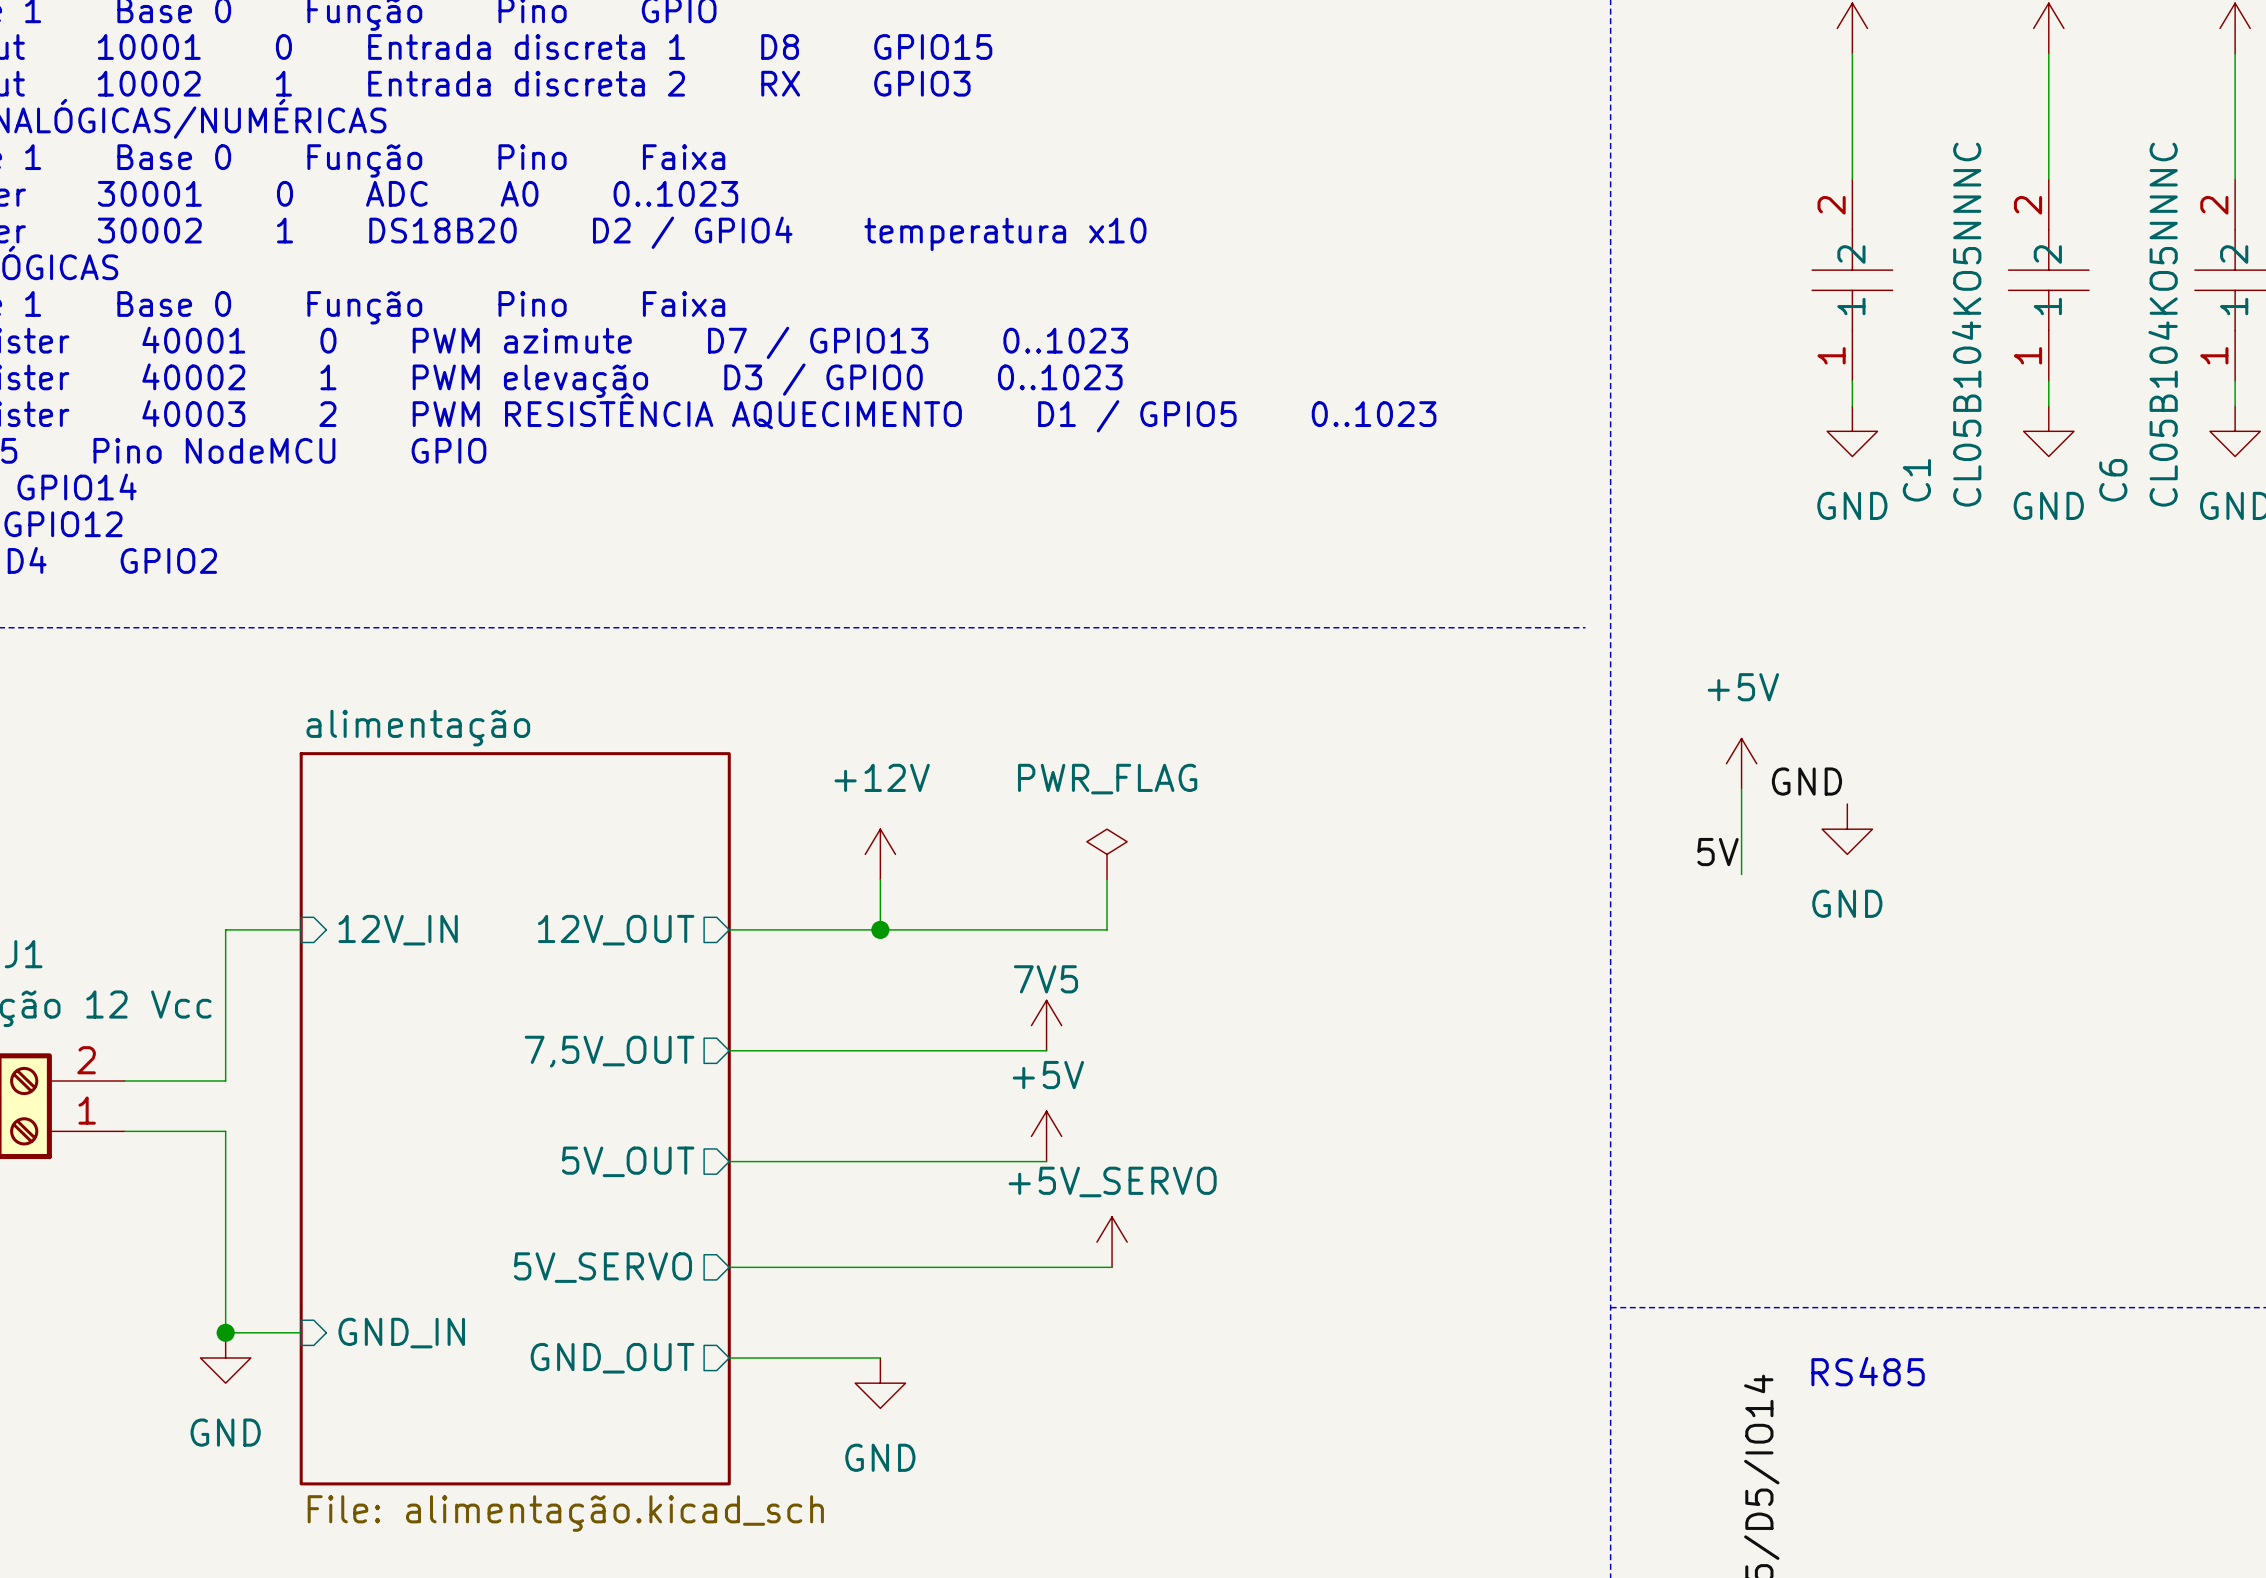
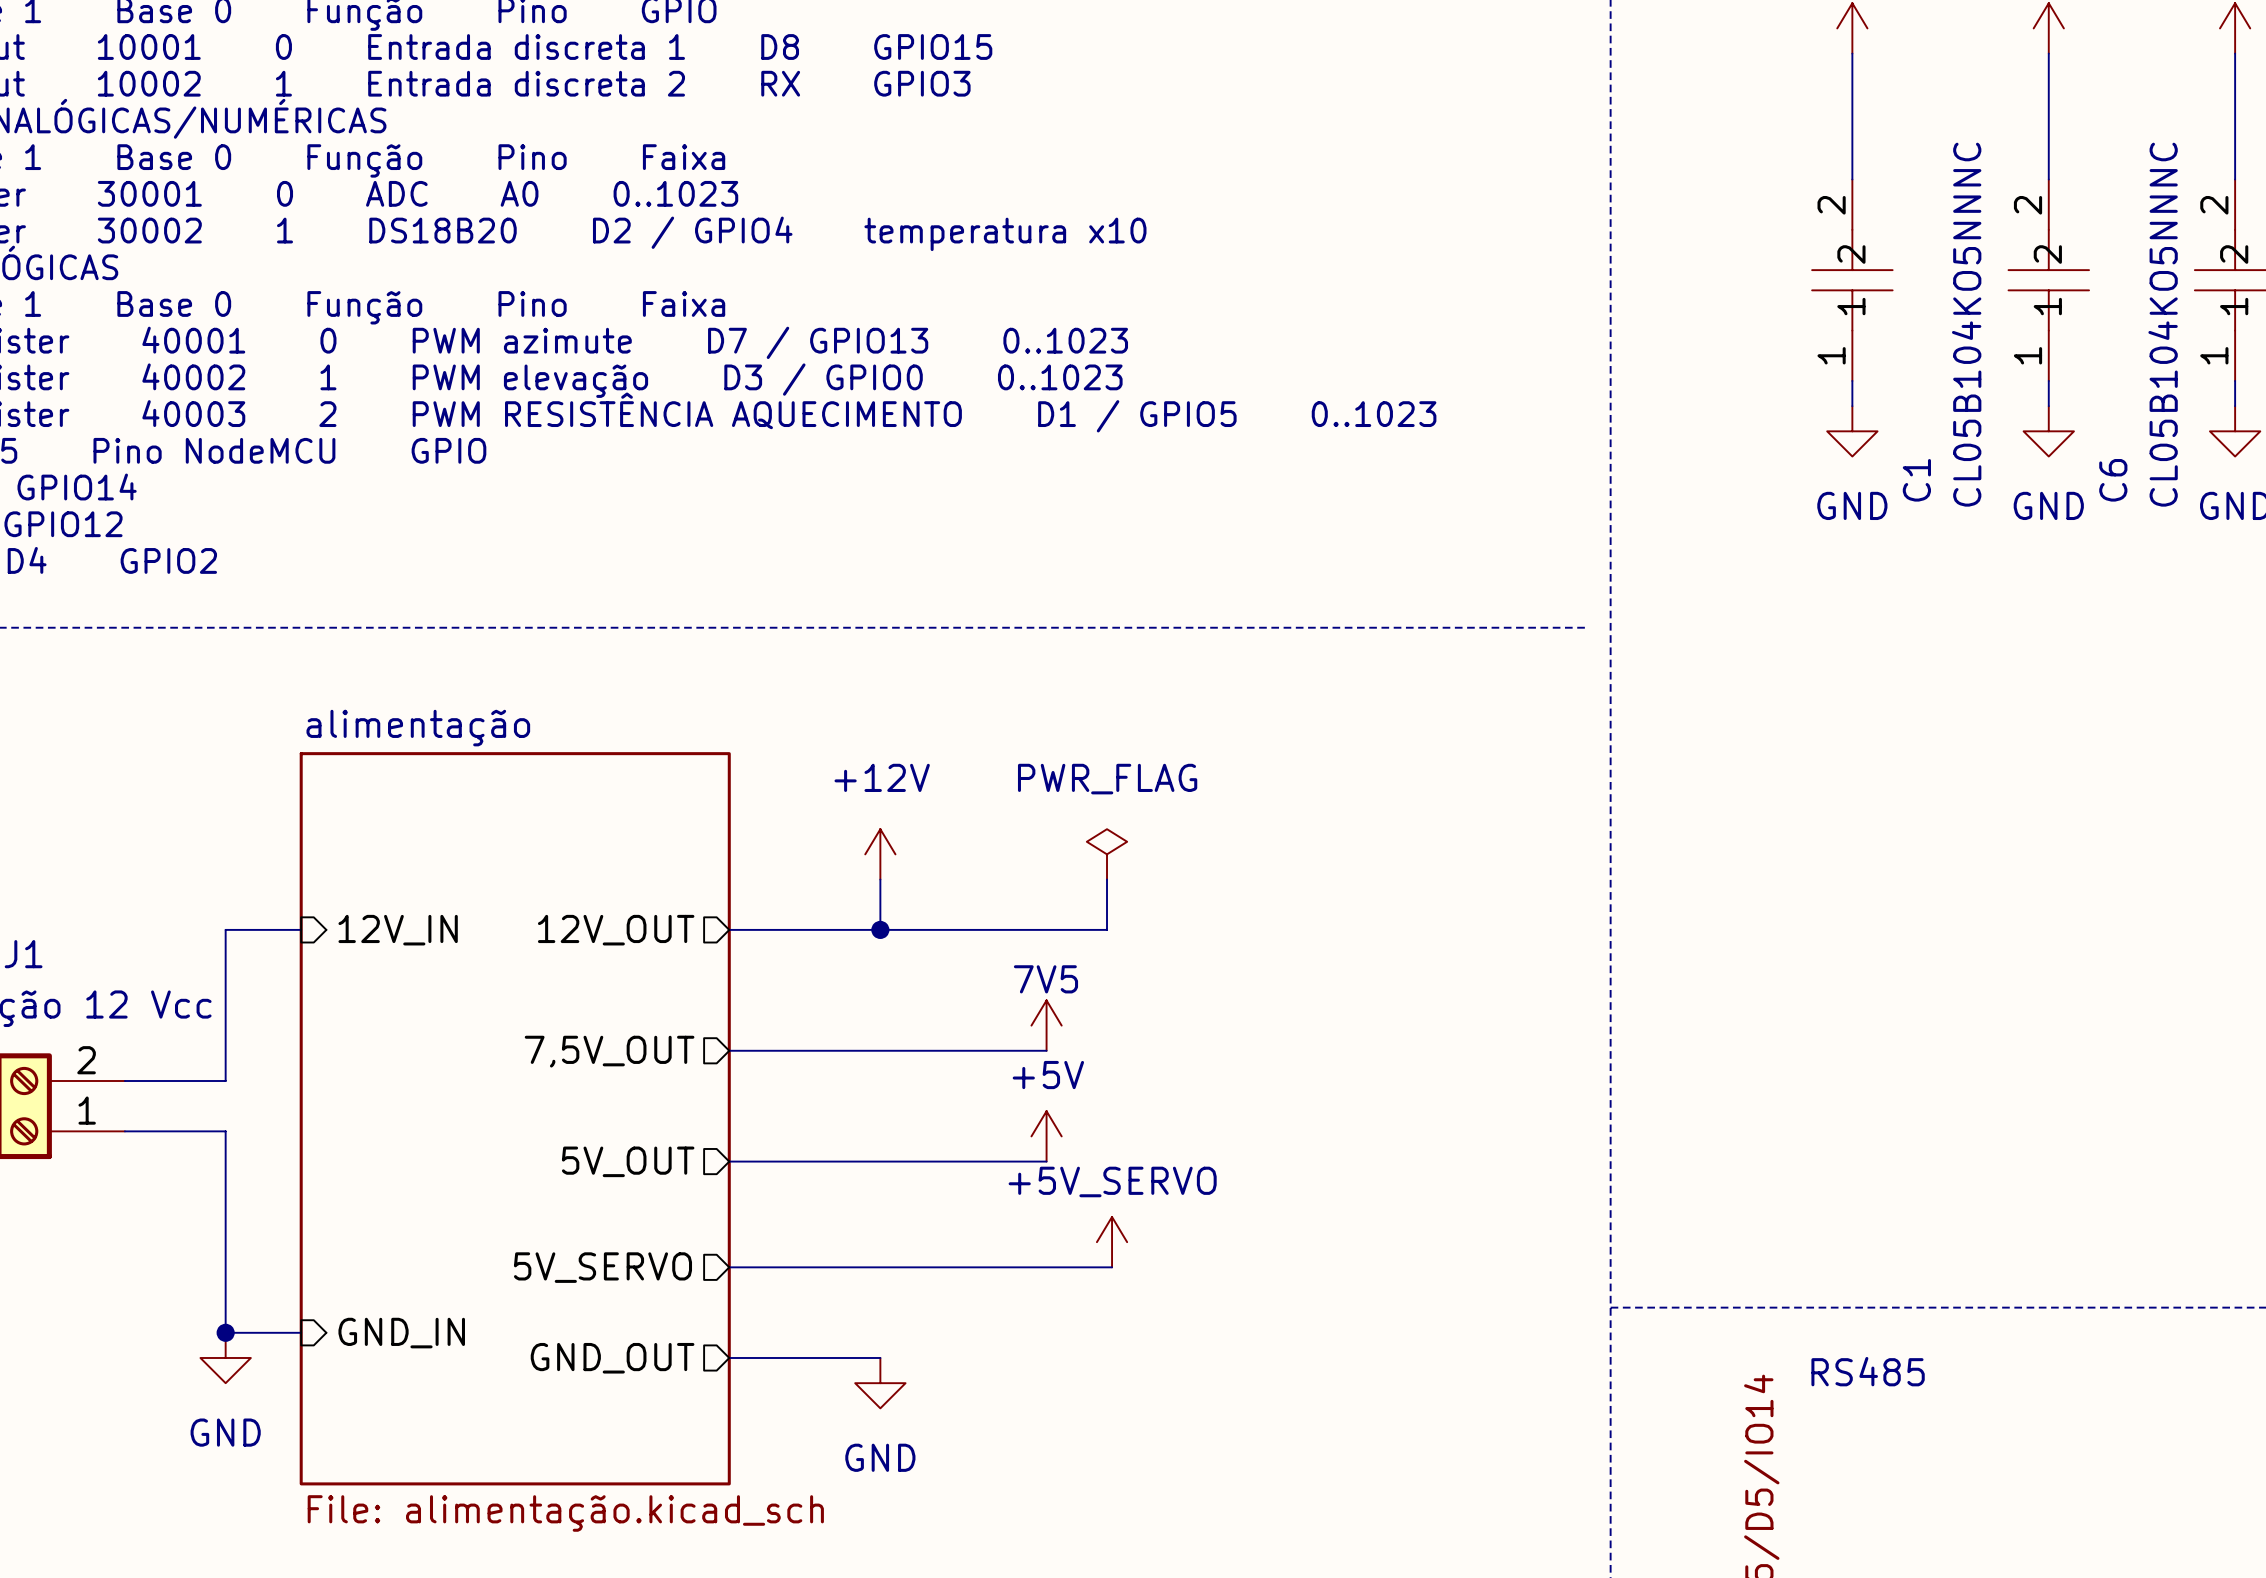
power symbol: +5V (1741, 763) -> none
label: GND (1806, 781) -> none
wire: (1741, 788) (1741, 874) -> none
power symbol: GND (1847, 829) -> none
label: 5V (1718, 852) -> none

